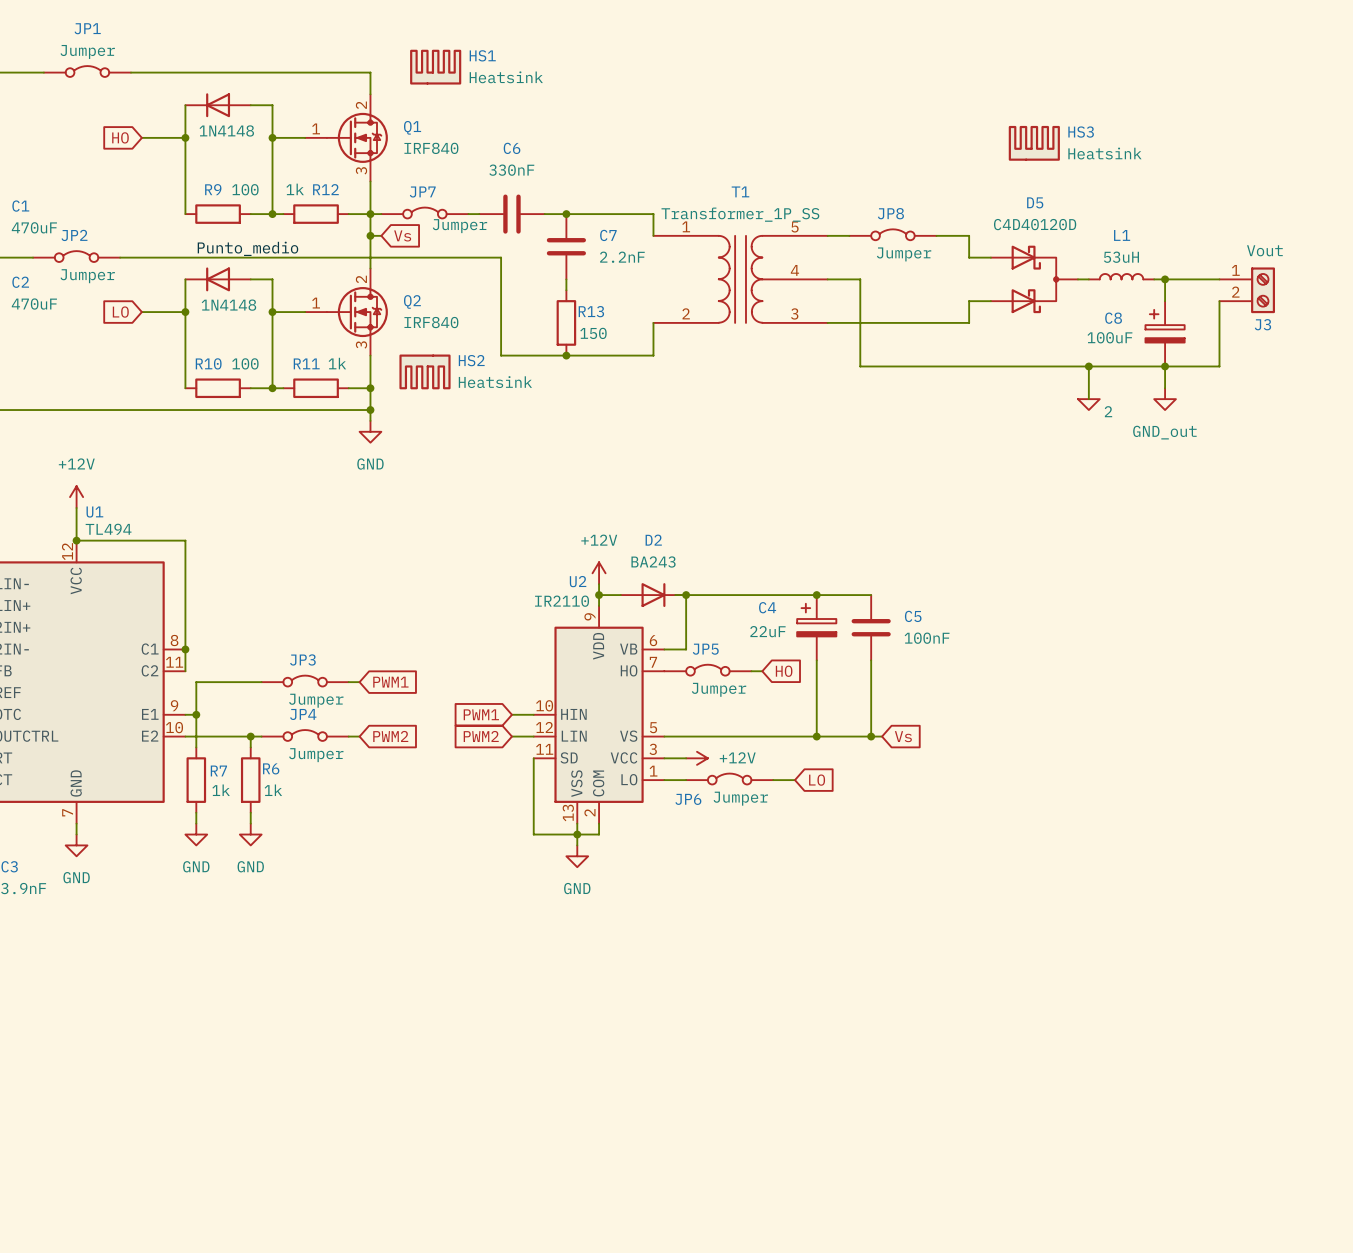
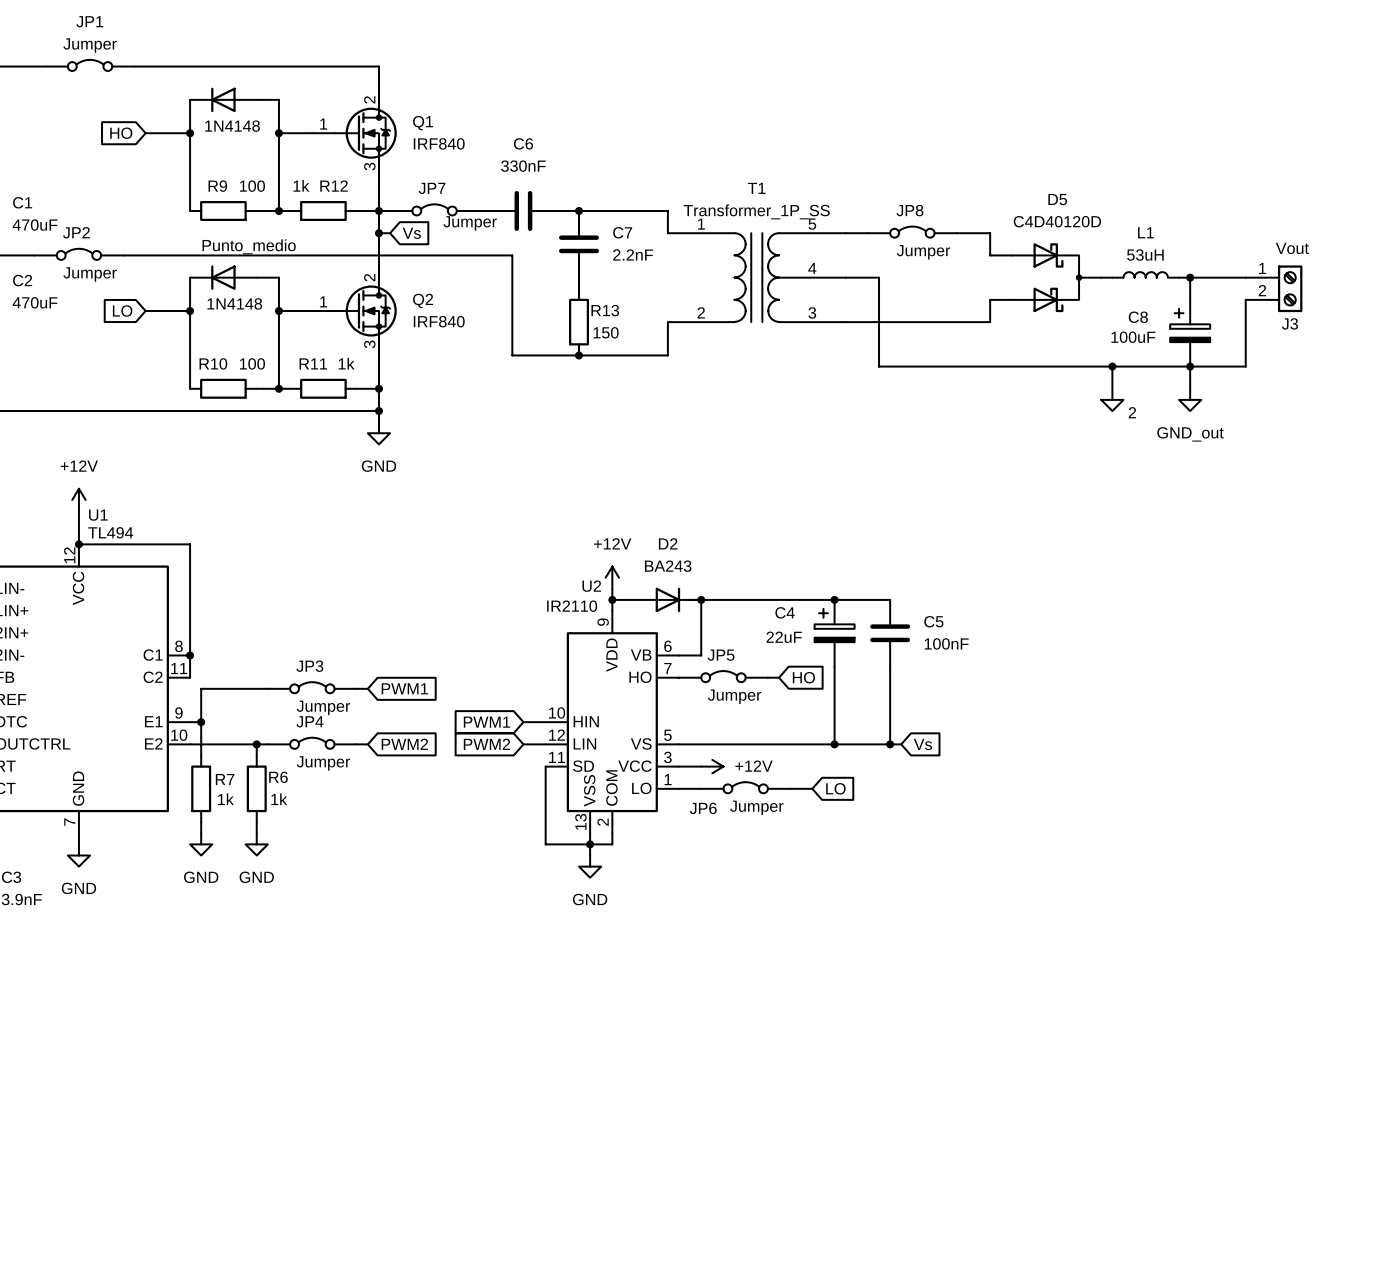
HS1: Heatsink (435, 67) -> none
HS3: Heatsink (1034, 143) -> none
HS2: Heatsink (425, 371) -> none

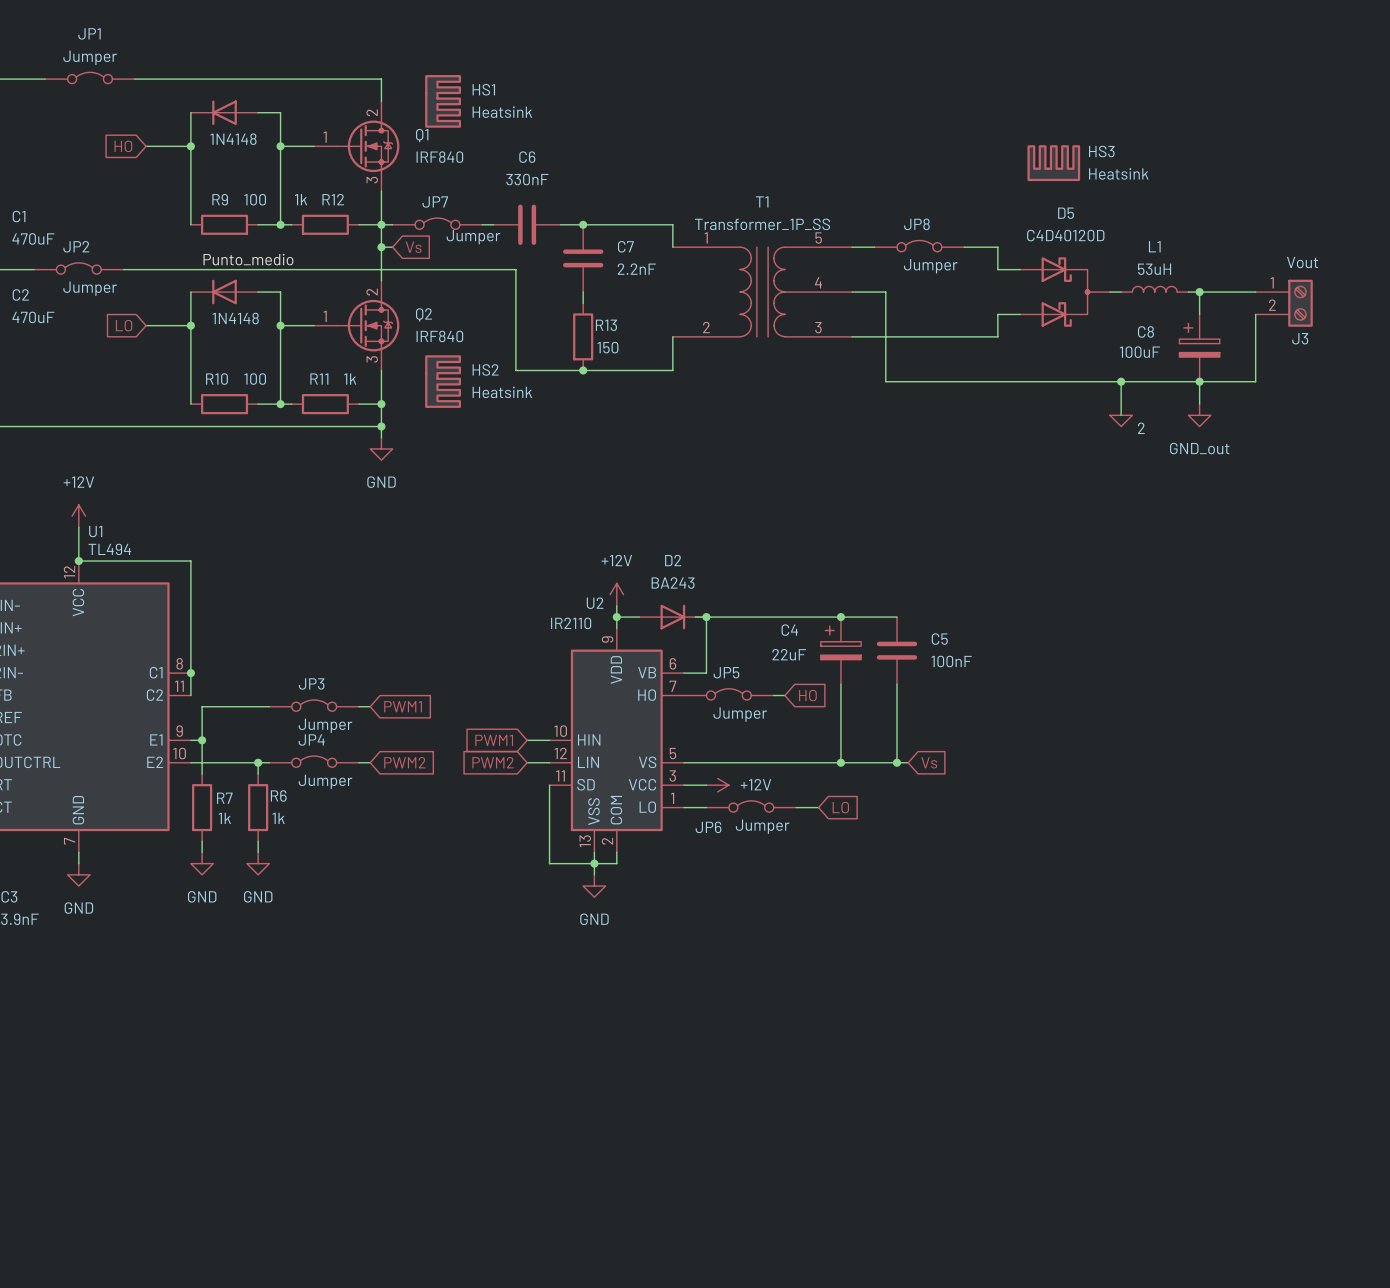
HS1: none -> Heatsink (443, 101)
HS3: none -> Heatsink (1053, 163)
HS2: none -> Heatsink (443, 381)

